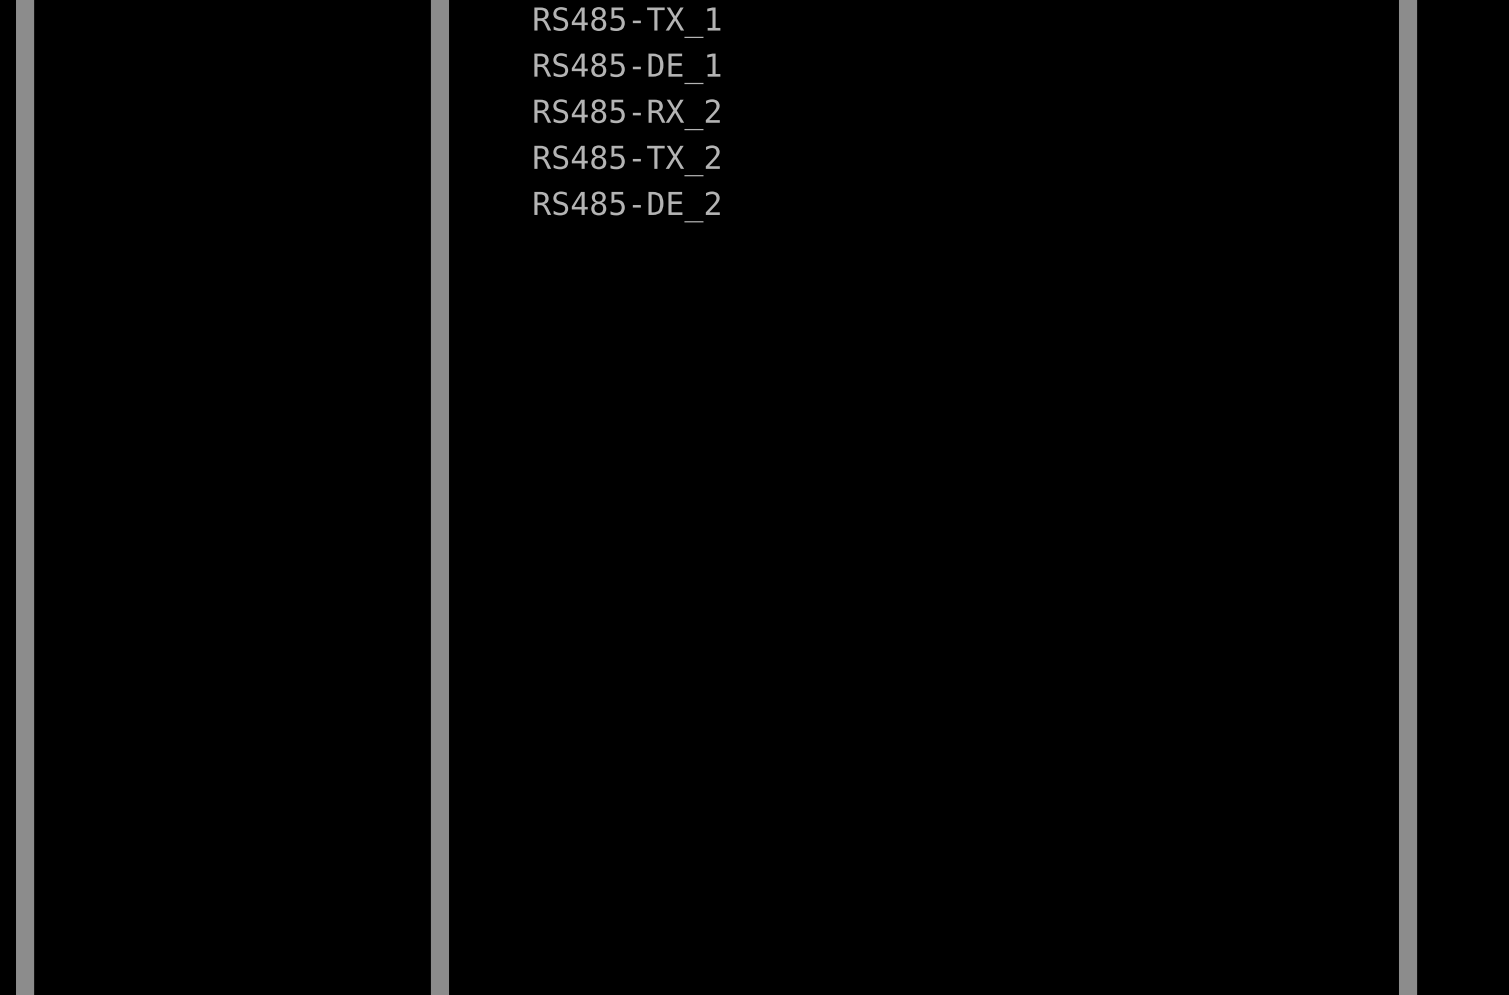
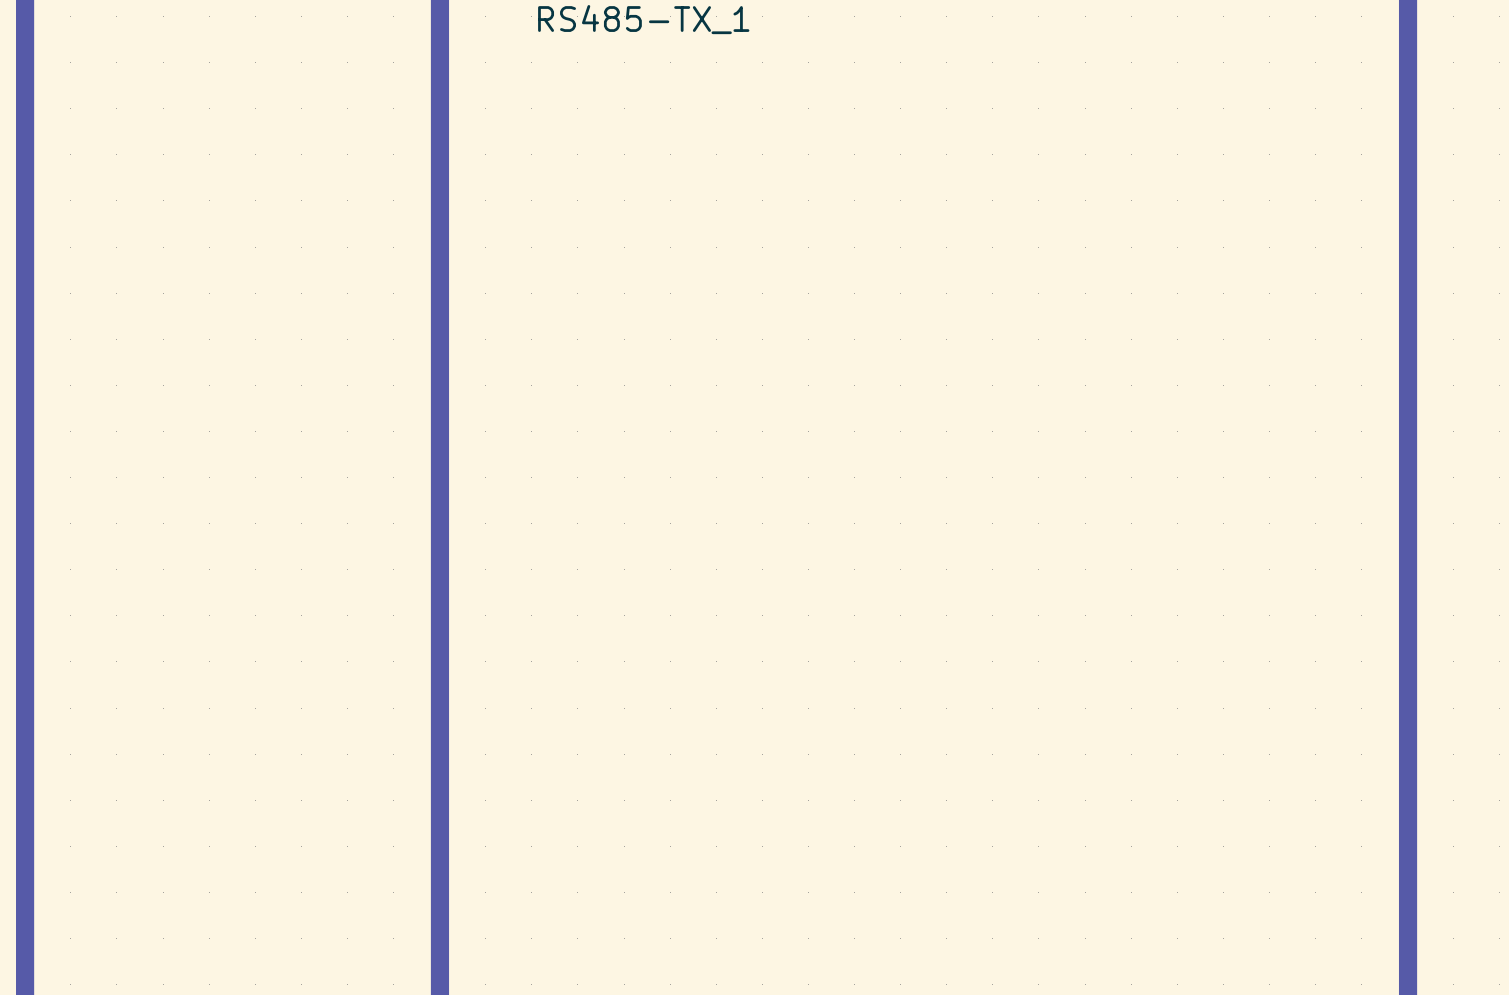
label: RS485-DE_1 (627, 68) -> none
label: RS485-RX_2 (627, 114) -> none
label: RS485-TX_2 (627, 160) -> none
label: RS485-DE_2 (627, 206) -> none

